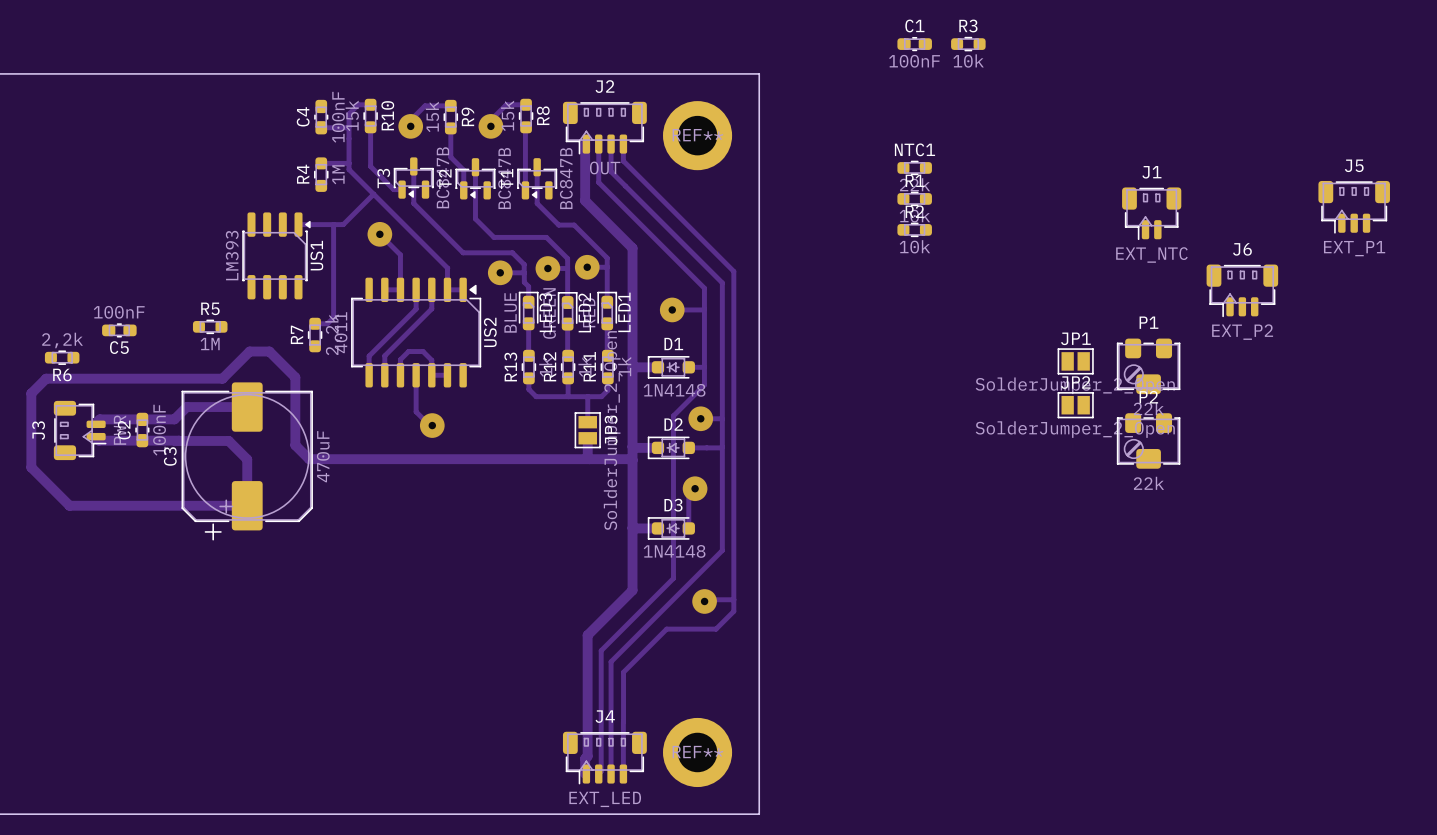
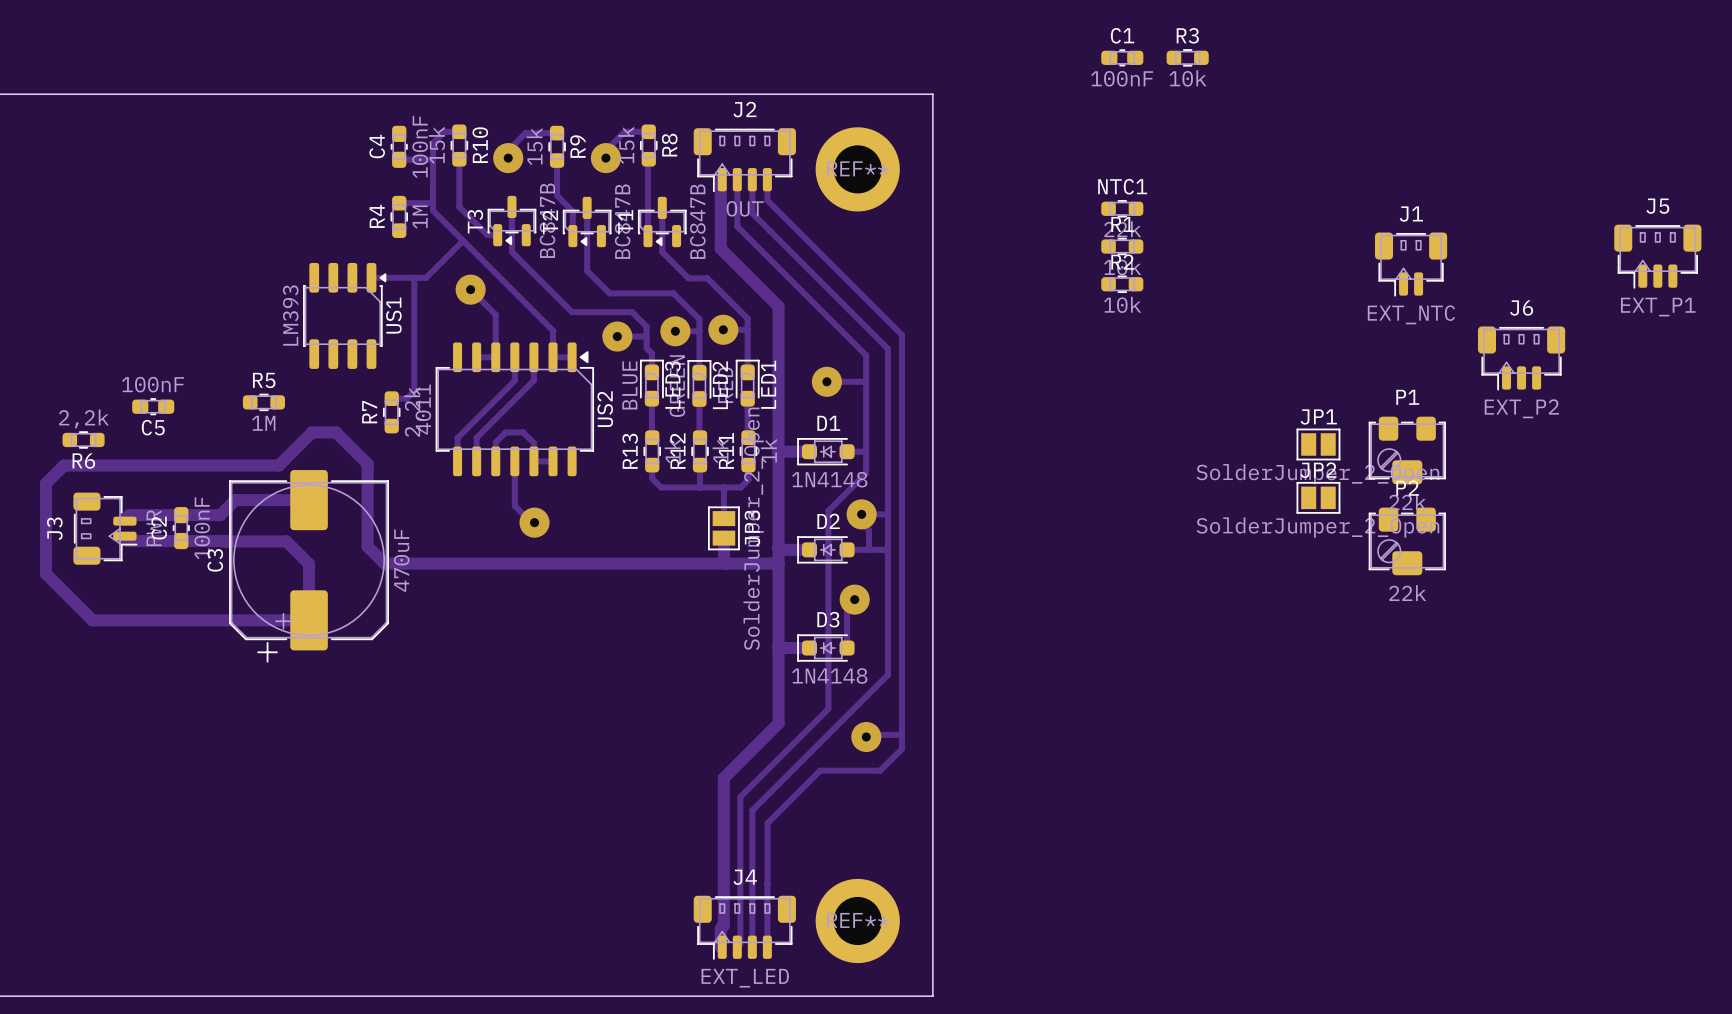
track: none -> (861, 522) (869, 530) (869, 549)

